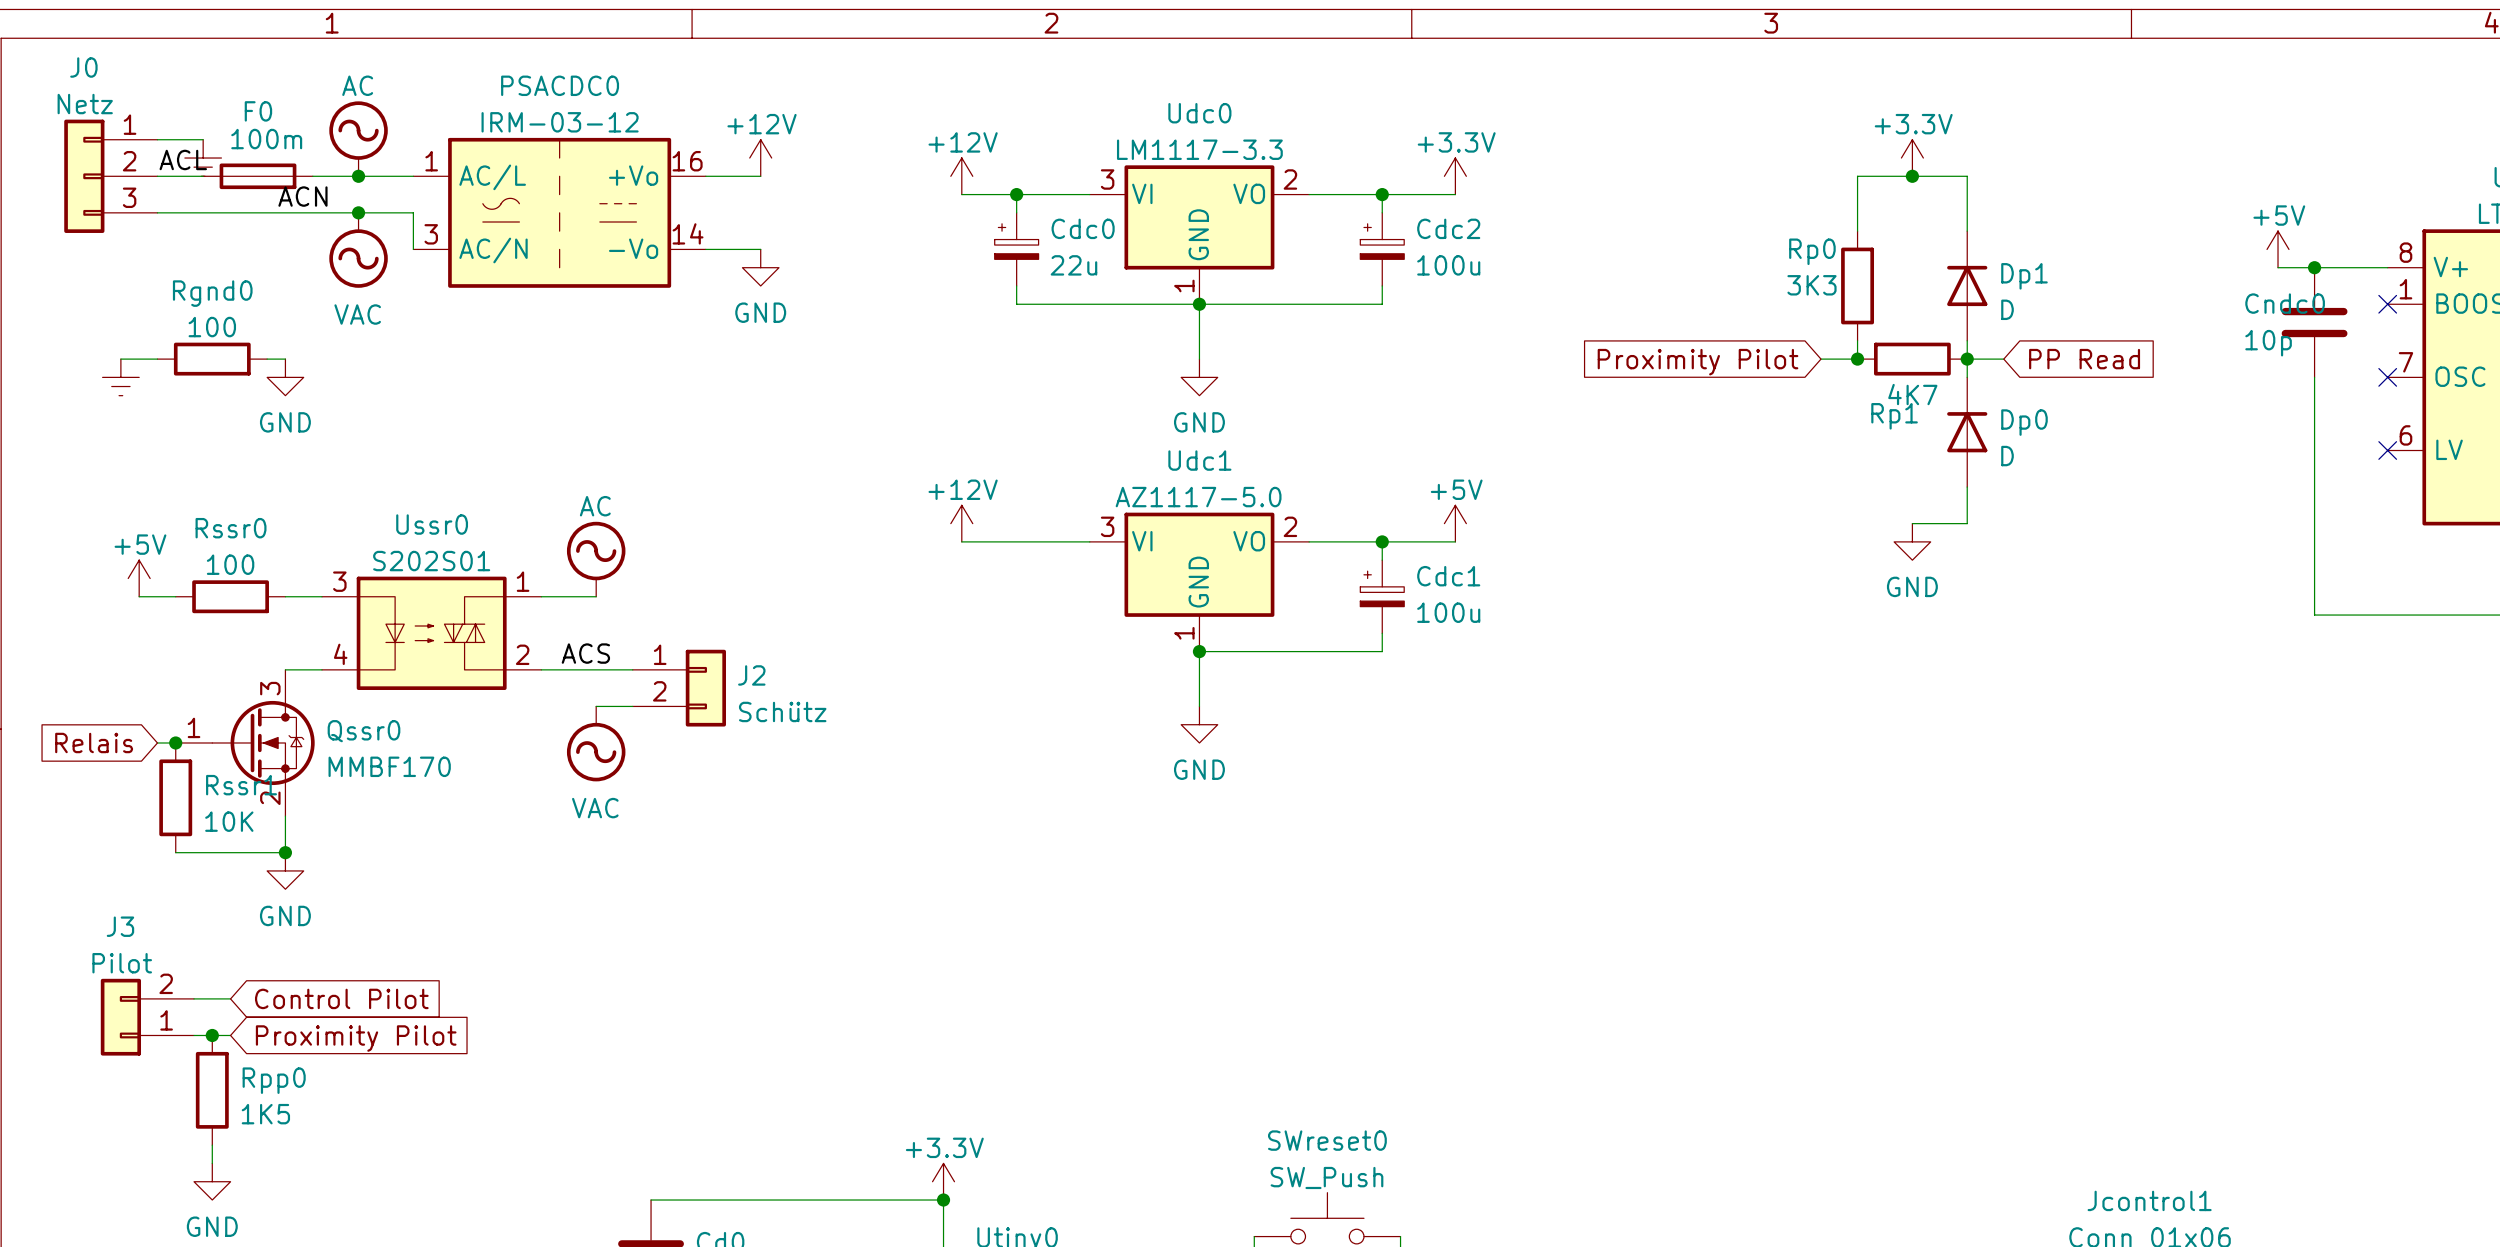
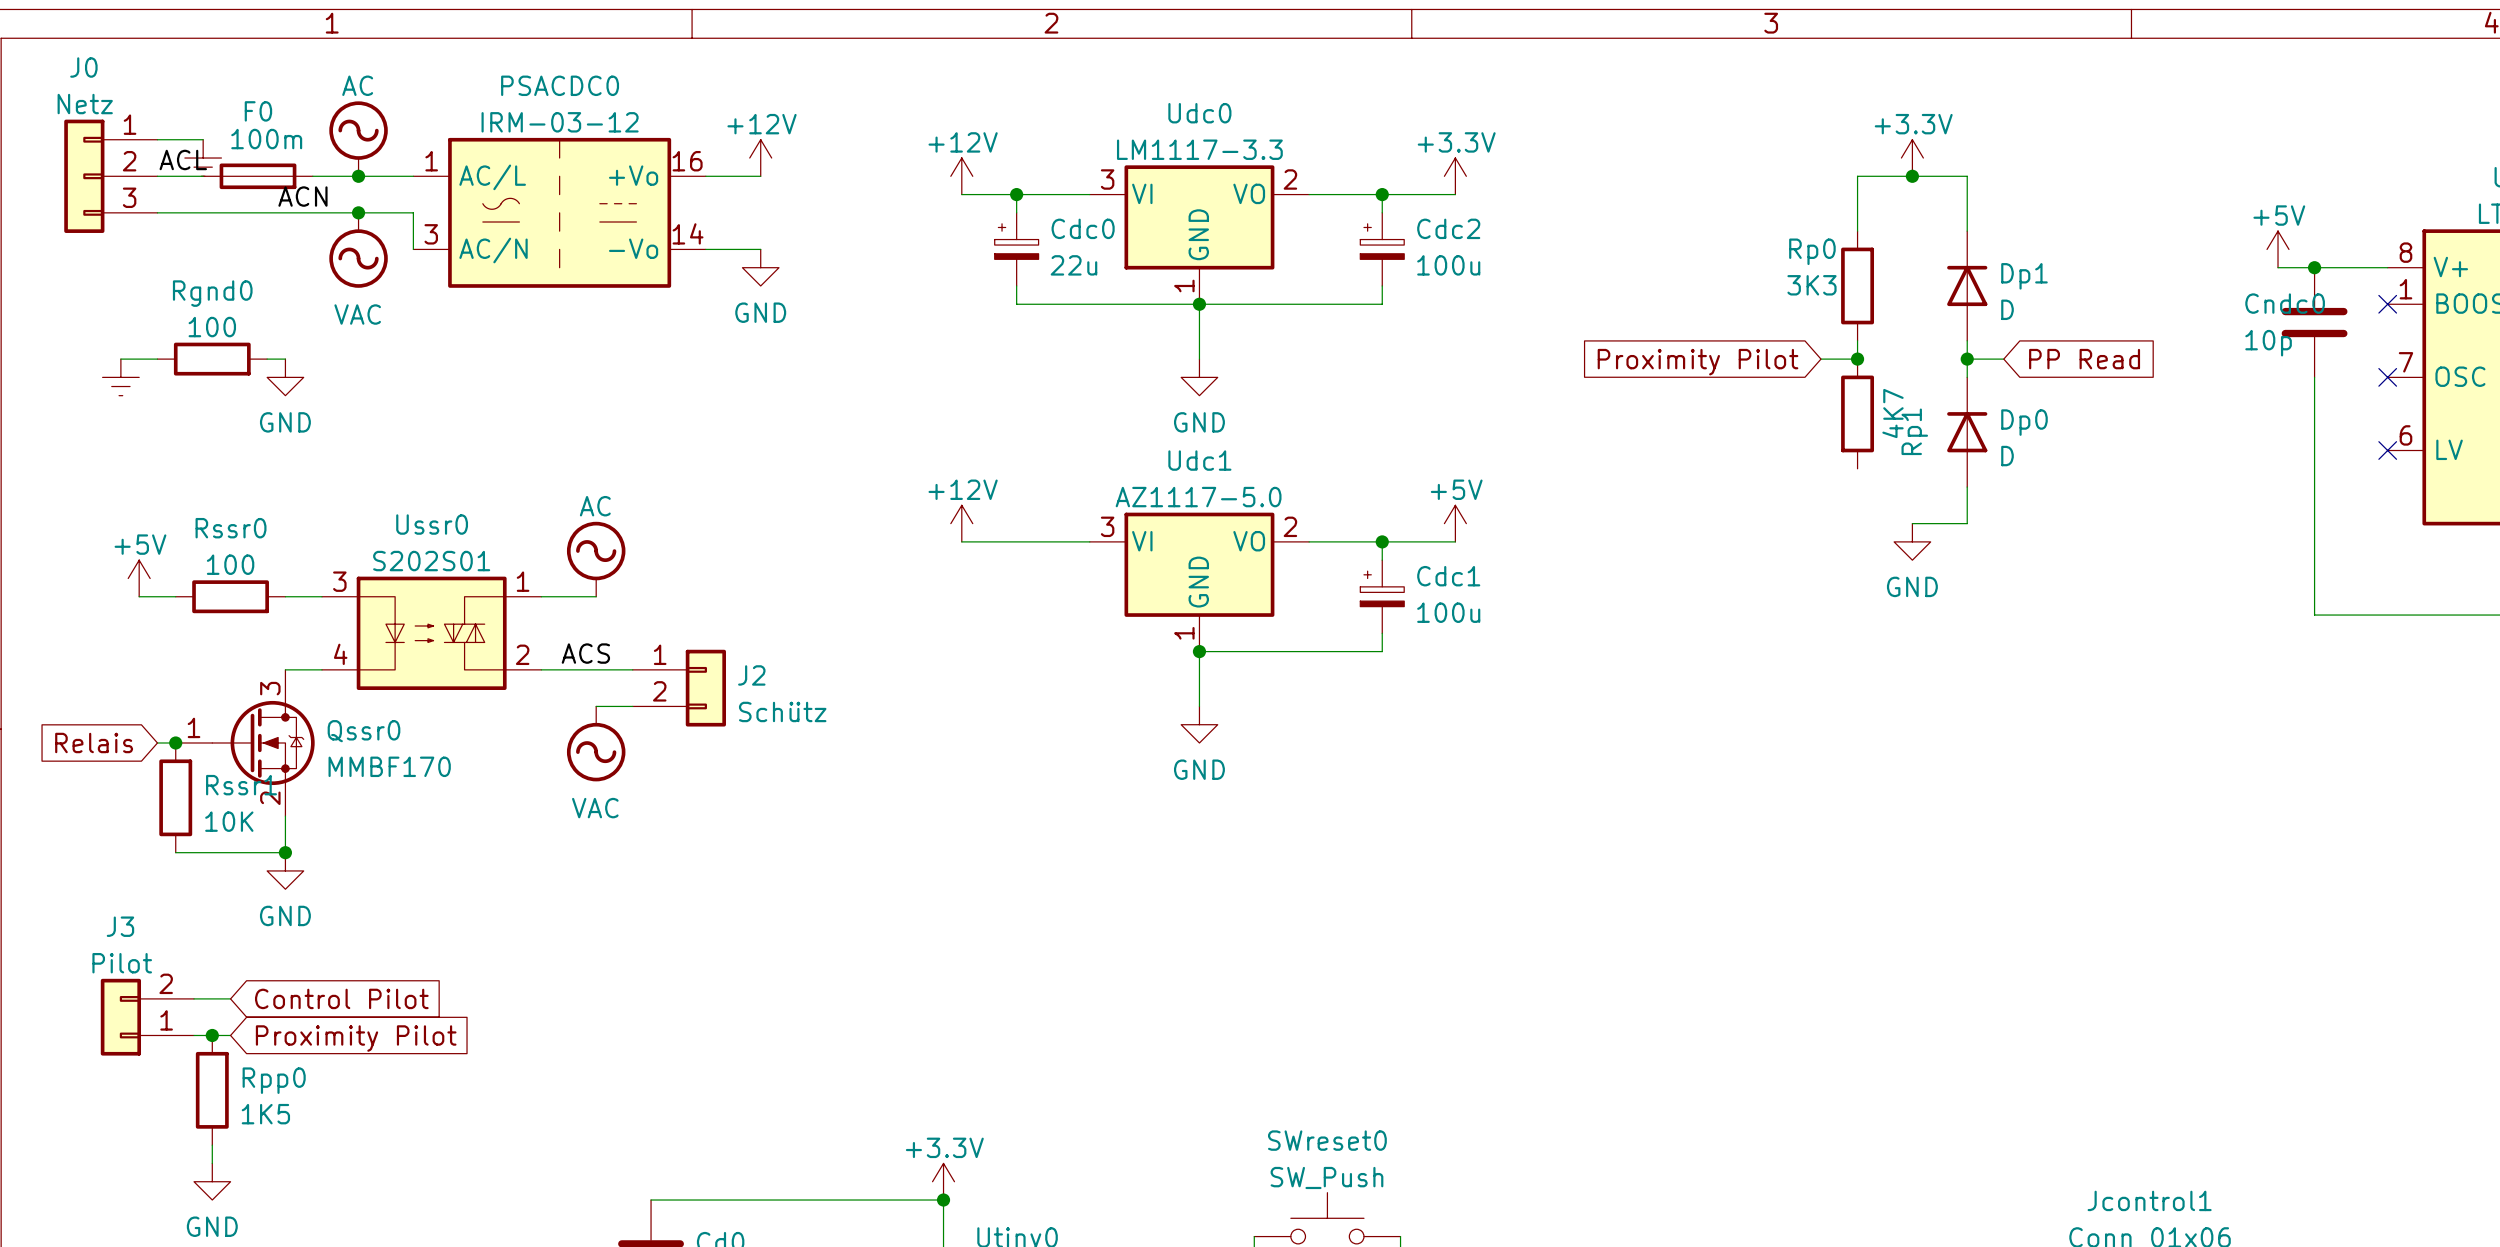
Rp1 rotation: 0° (1912, 359) -> 90° clockwise (1857, 413)
Rp1 position: (1912, 359) -> (1857, 413)
Rp1 value position: 4K7 (1912, 394) -> 4K7 (1893, 413)
Rp1 name position: Rp1 (1894, 416) -> Rp1 (1914, 431)

